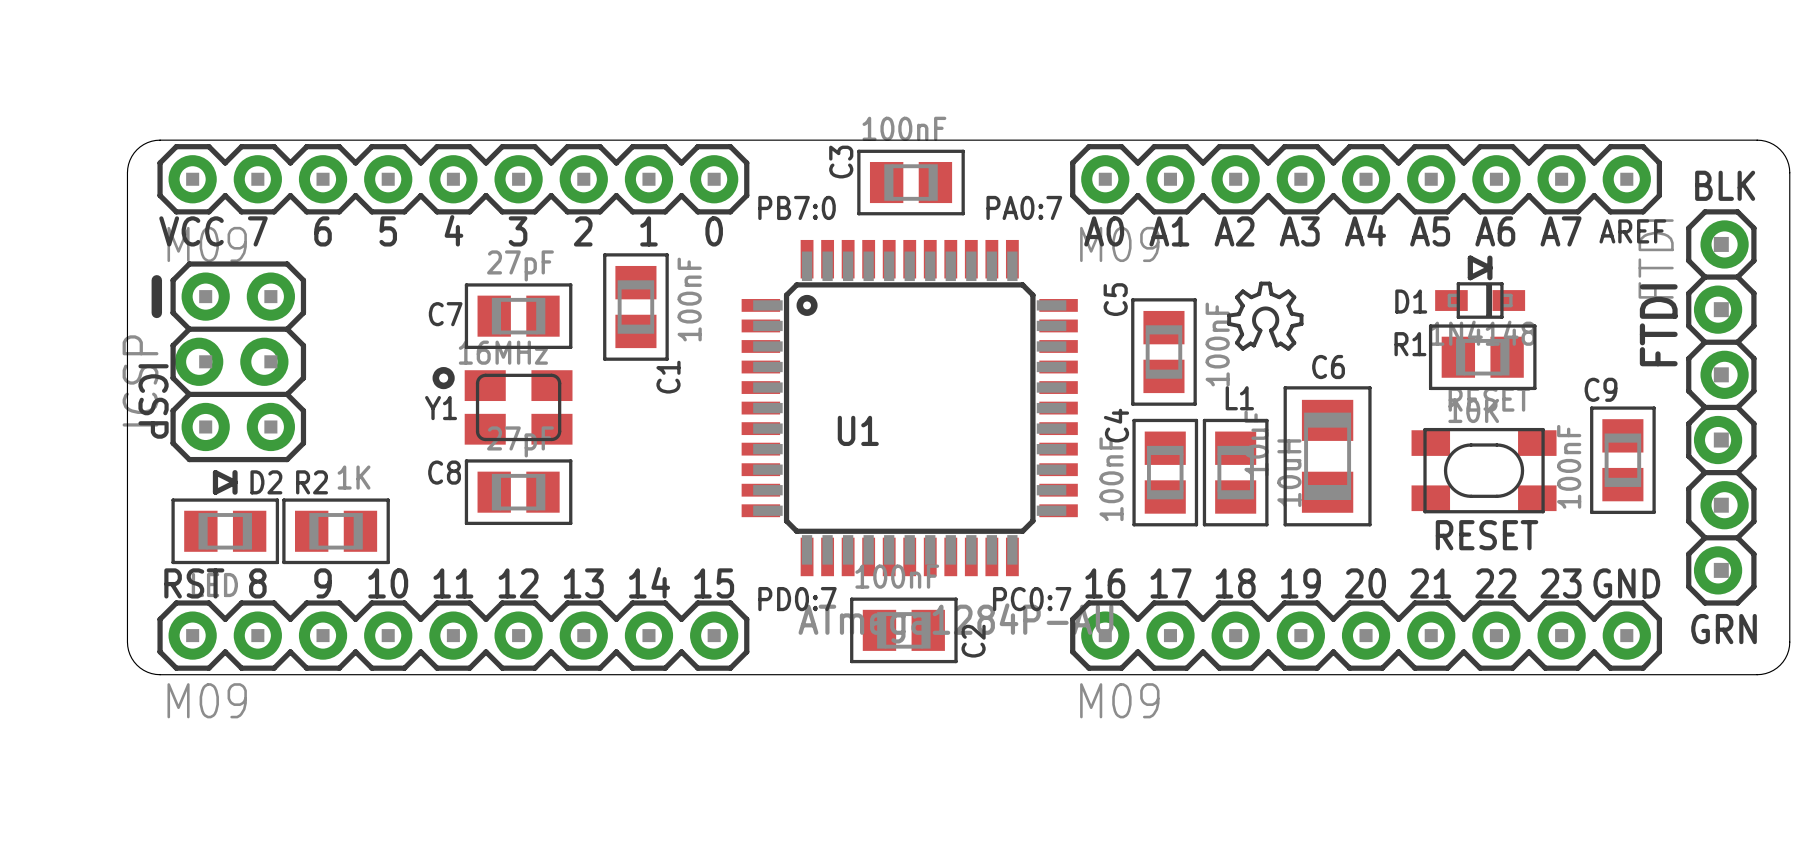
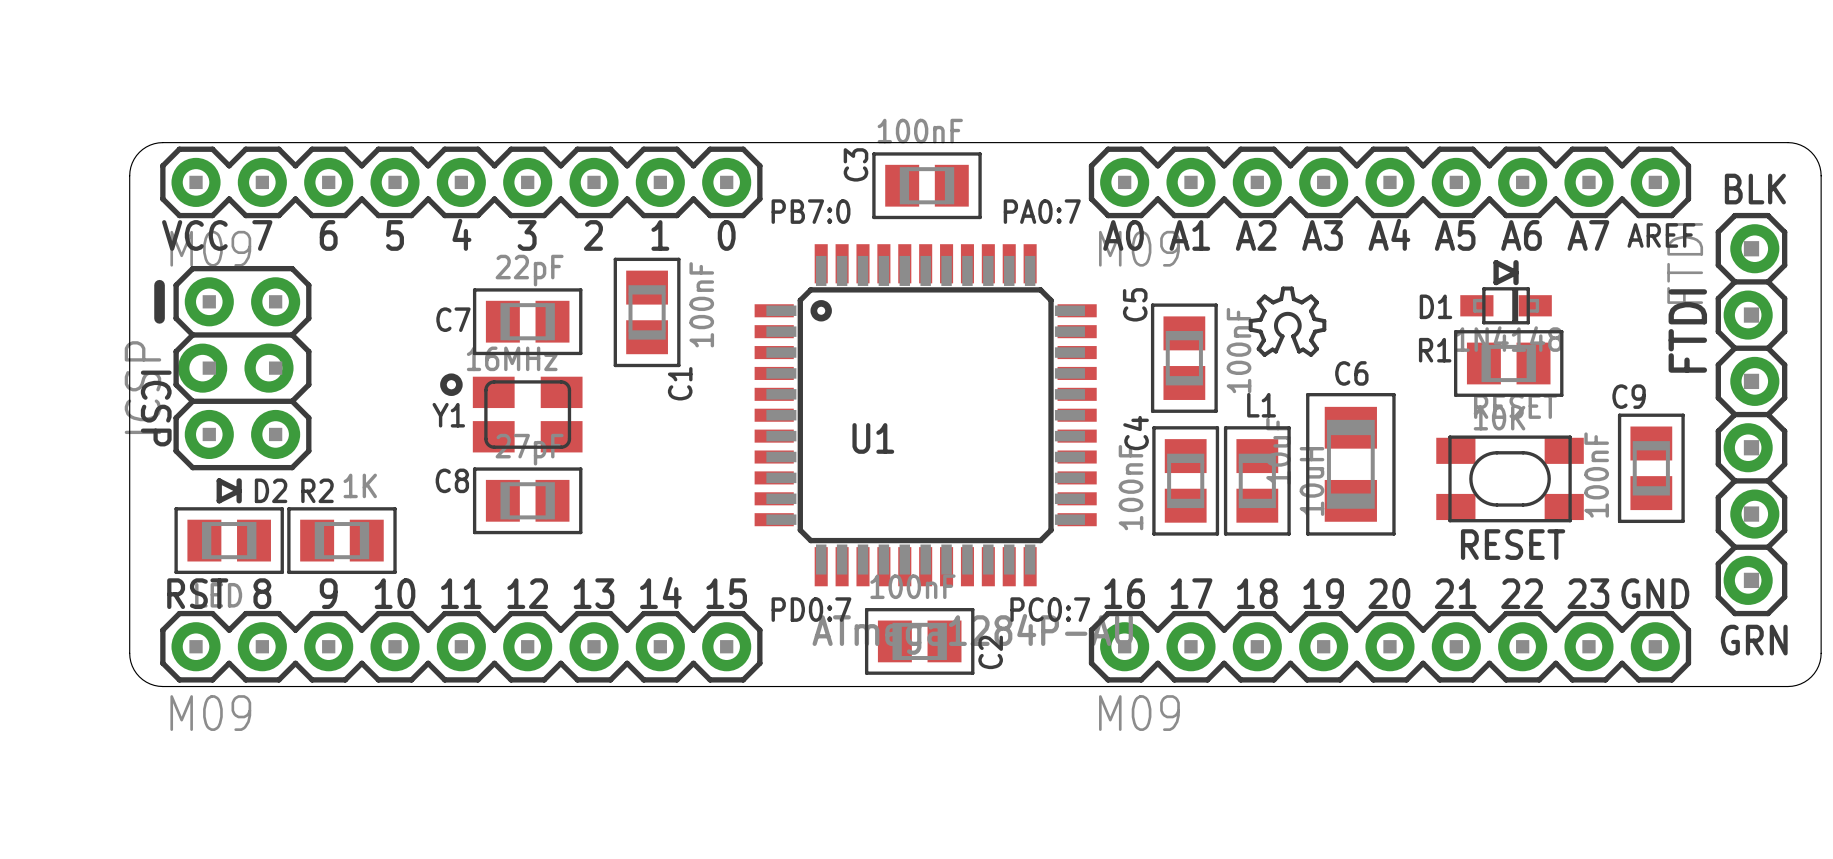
C7 value: 27pF (520, 265) -> 22pF (529, 270)

